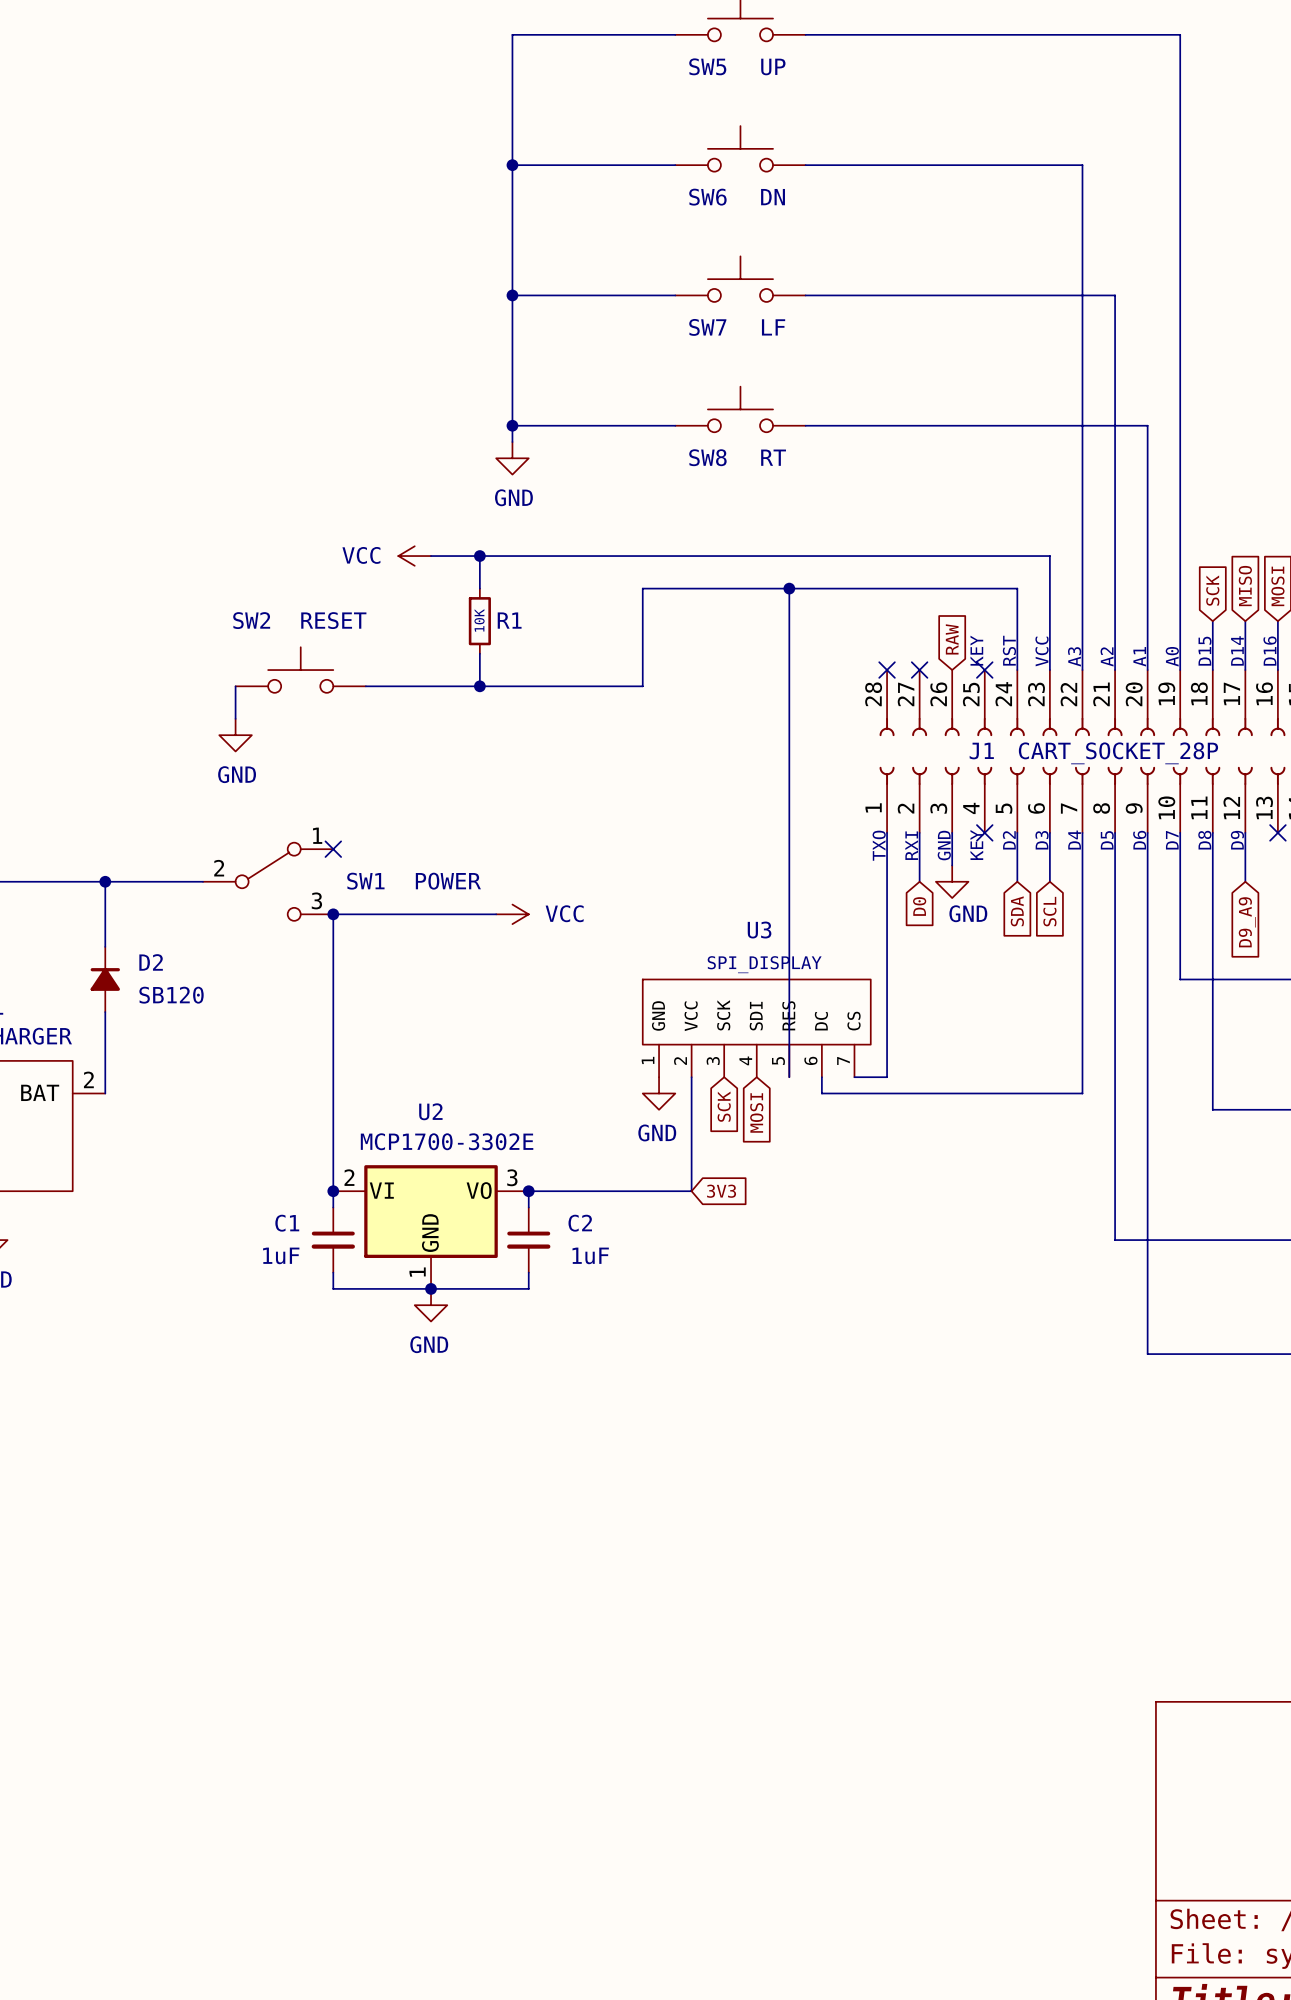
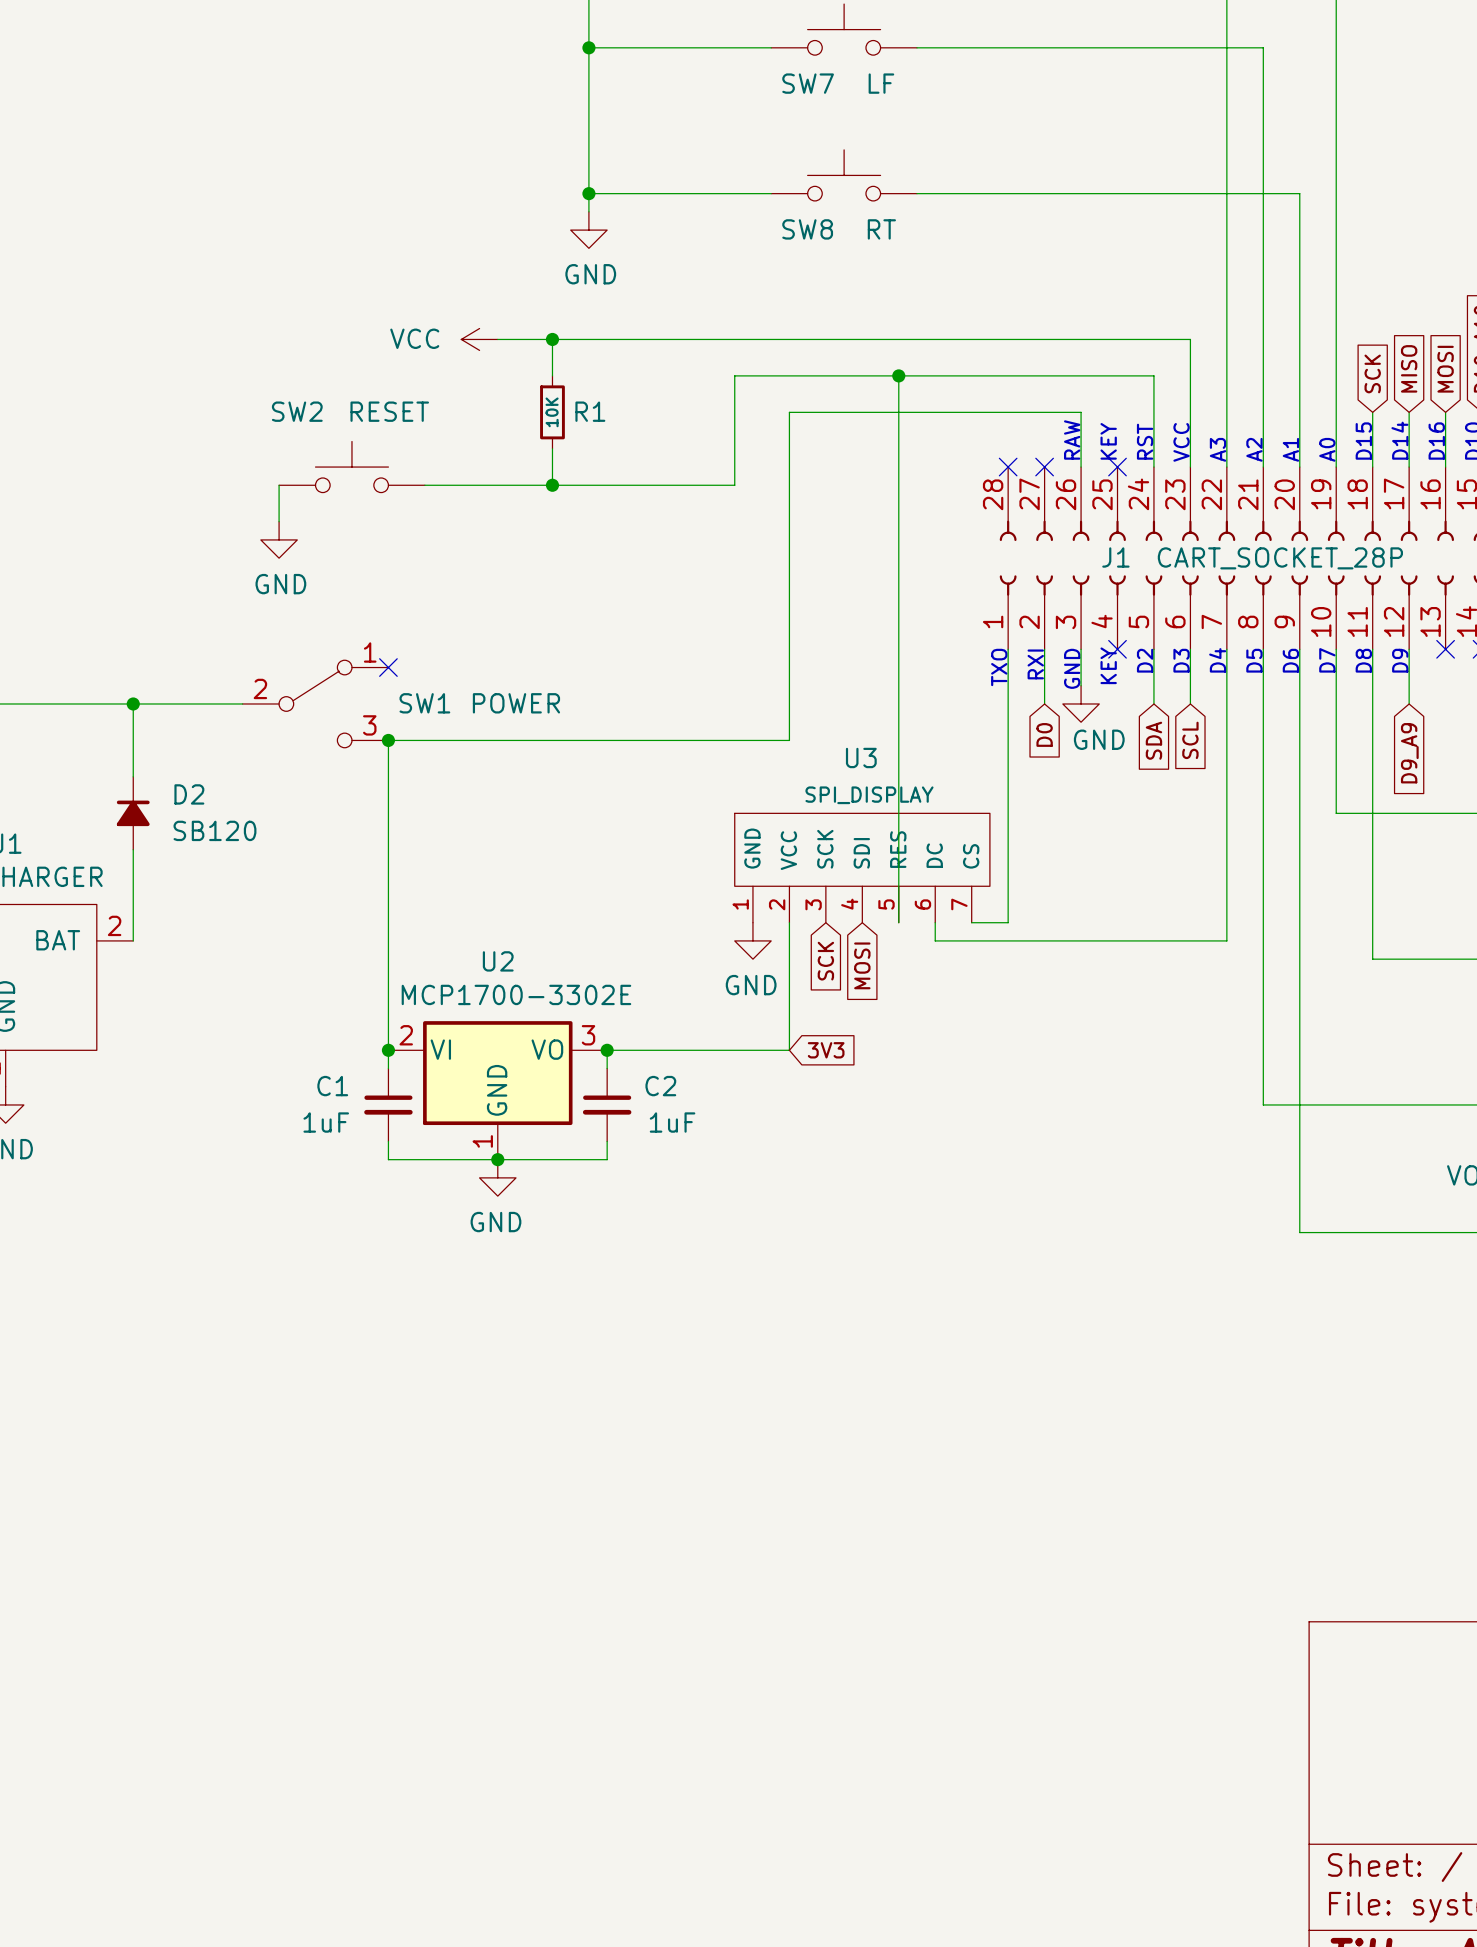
global label: RAW (952, 639) -> none
text: none -> RAW (1072, 440)
wire: none -> (1081, 467) (1081, 412) (789, 412) (789, 740) (570, 740)
power symbol: VCC (512, 914) -> none

